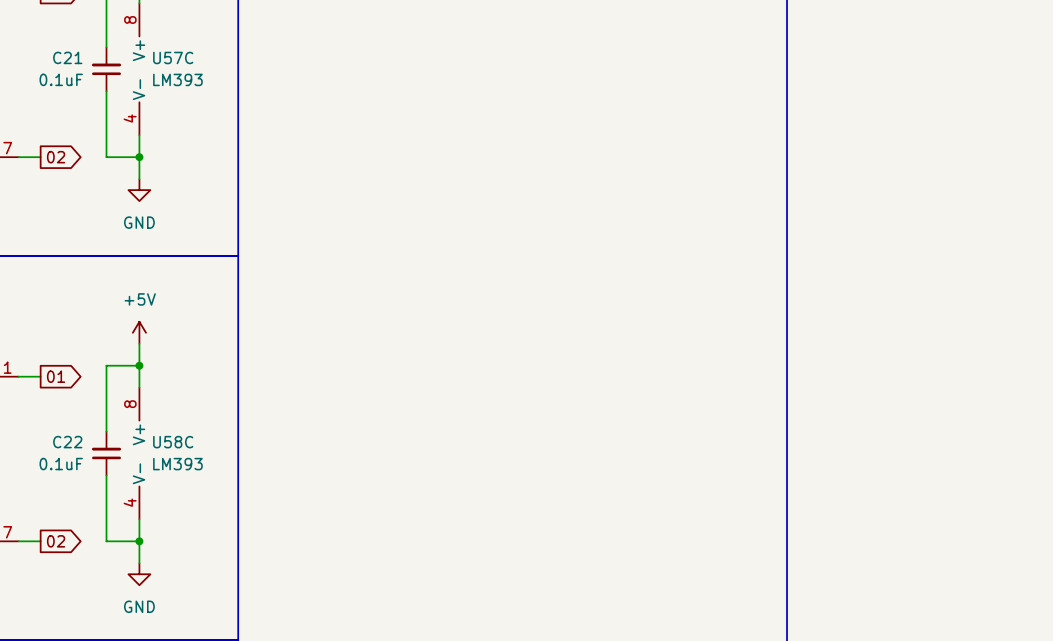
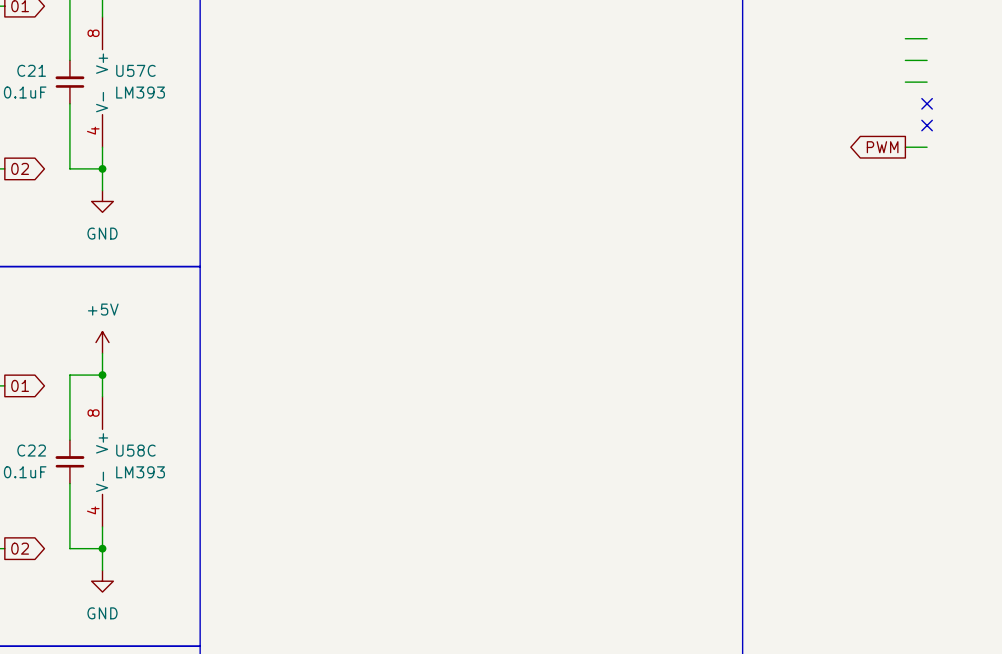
wire: none -> (905, 38) (927, 38)
wire: none -> (905, 60) (927, 60)
wire: none -> (905, 82) (927, 82)
no-connect mark: none -> (927, 103)
no-connect mark: none -> (927, 125)
global label: none -> PWM (882, 147)
wire: none -> (905, 147) (927, 147)

